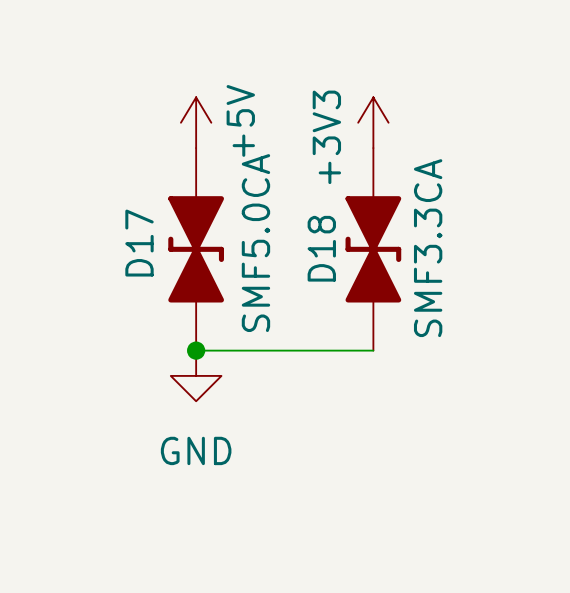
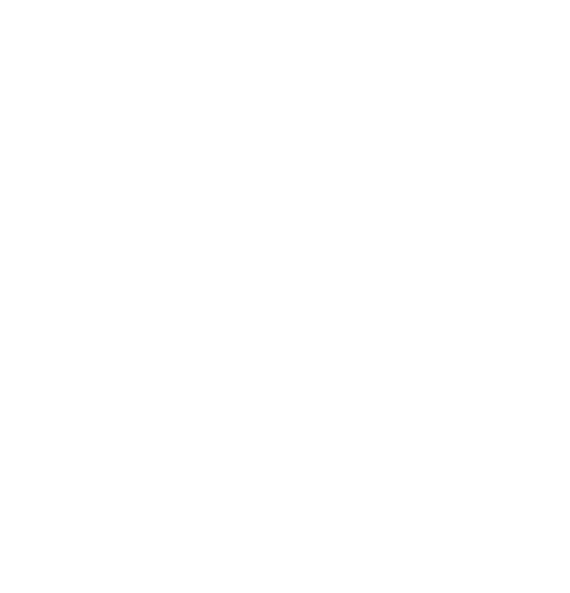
power symbol: +5V (196, 122) -> none
power symbol: +3V3 (373, 122) -> none
D17: SMF5.0CA (196, 249) -> none
D18: SMF3.3CA (373, 249) -> none
wire: (196, 350) (373, 350) -> none
junction: (196, 350) -> none
power symbol: GND (196, 375) -> none

